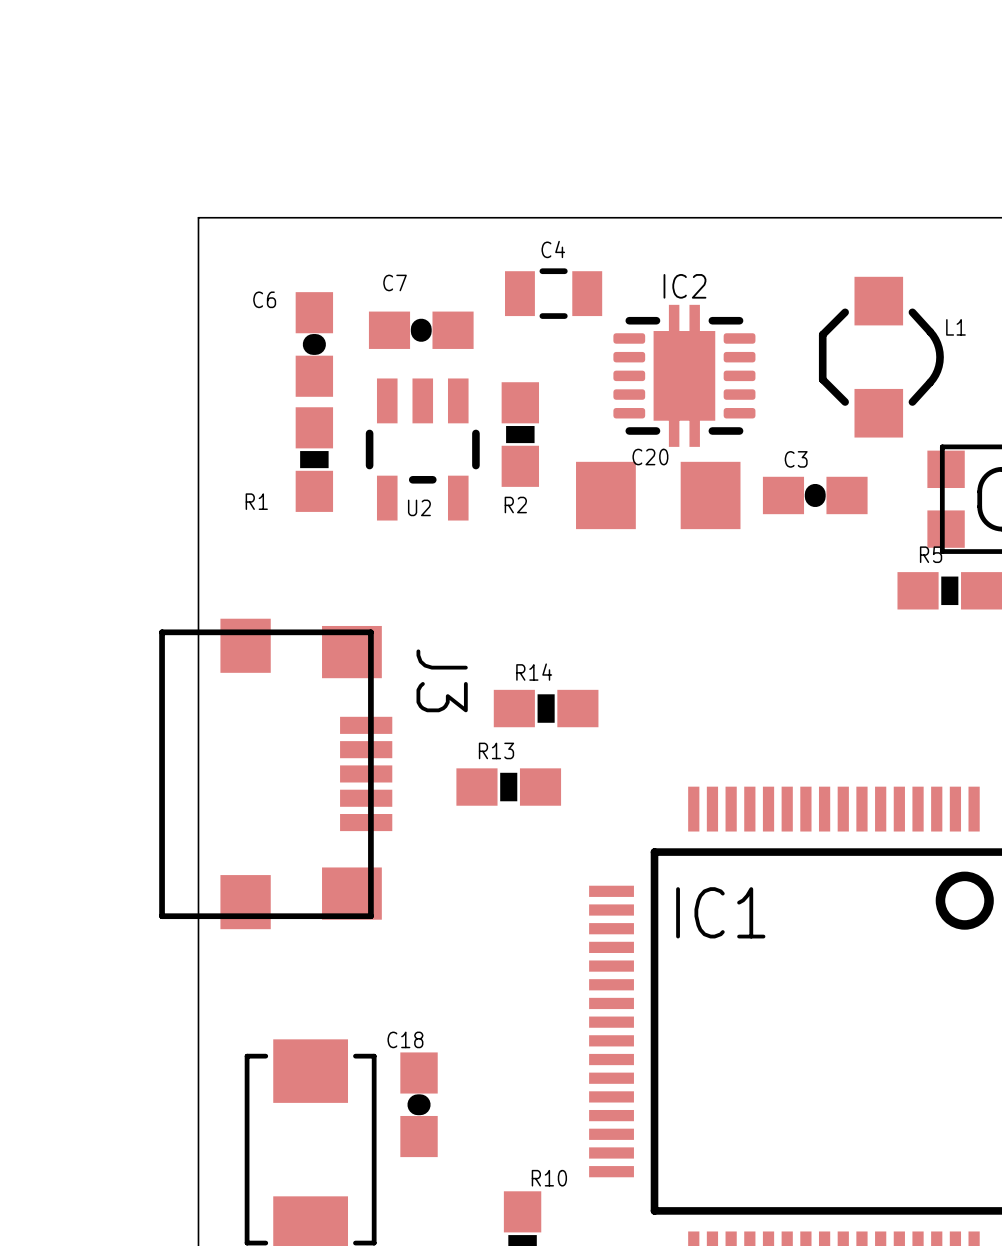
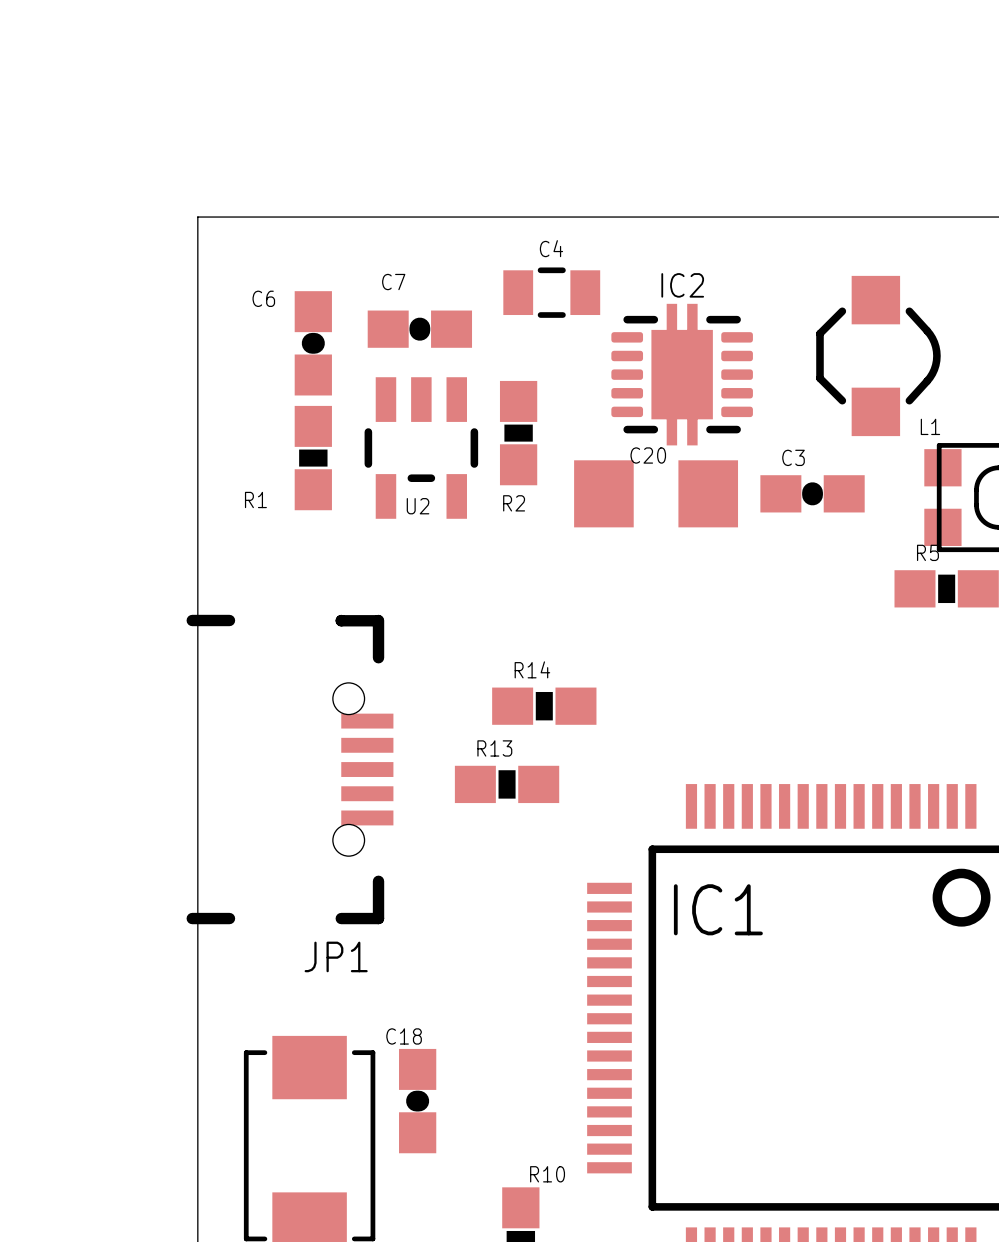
L1 name position: L1 (955, 327) -> L1 (930, 426)
JP1: none -> (289, 769)
J3: (275, 773) -> none

